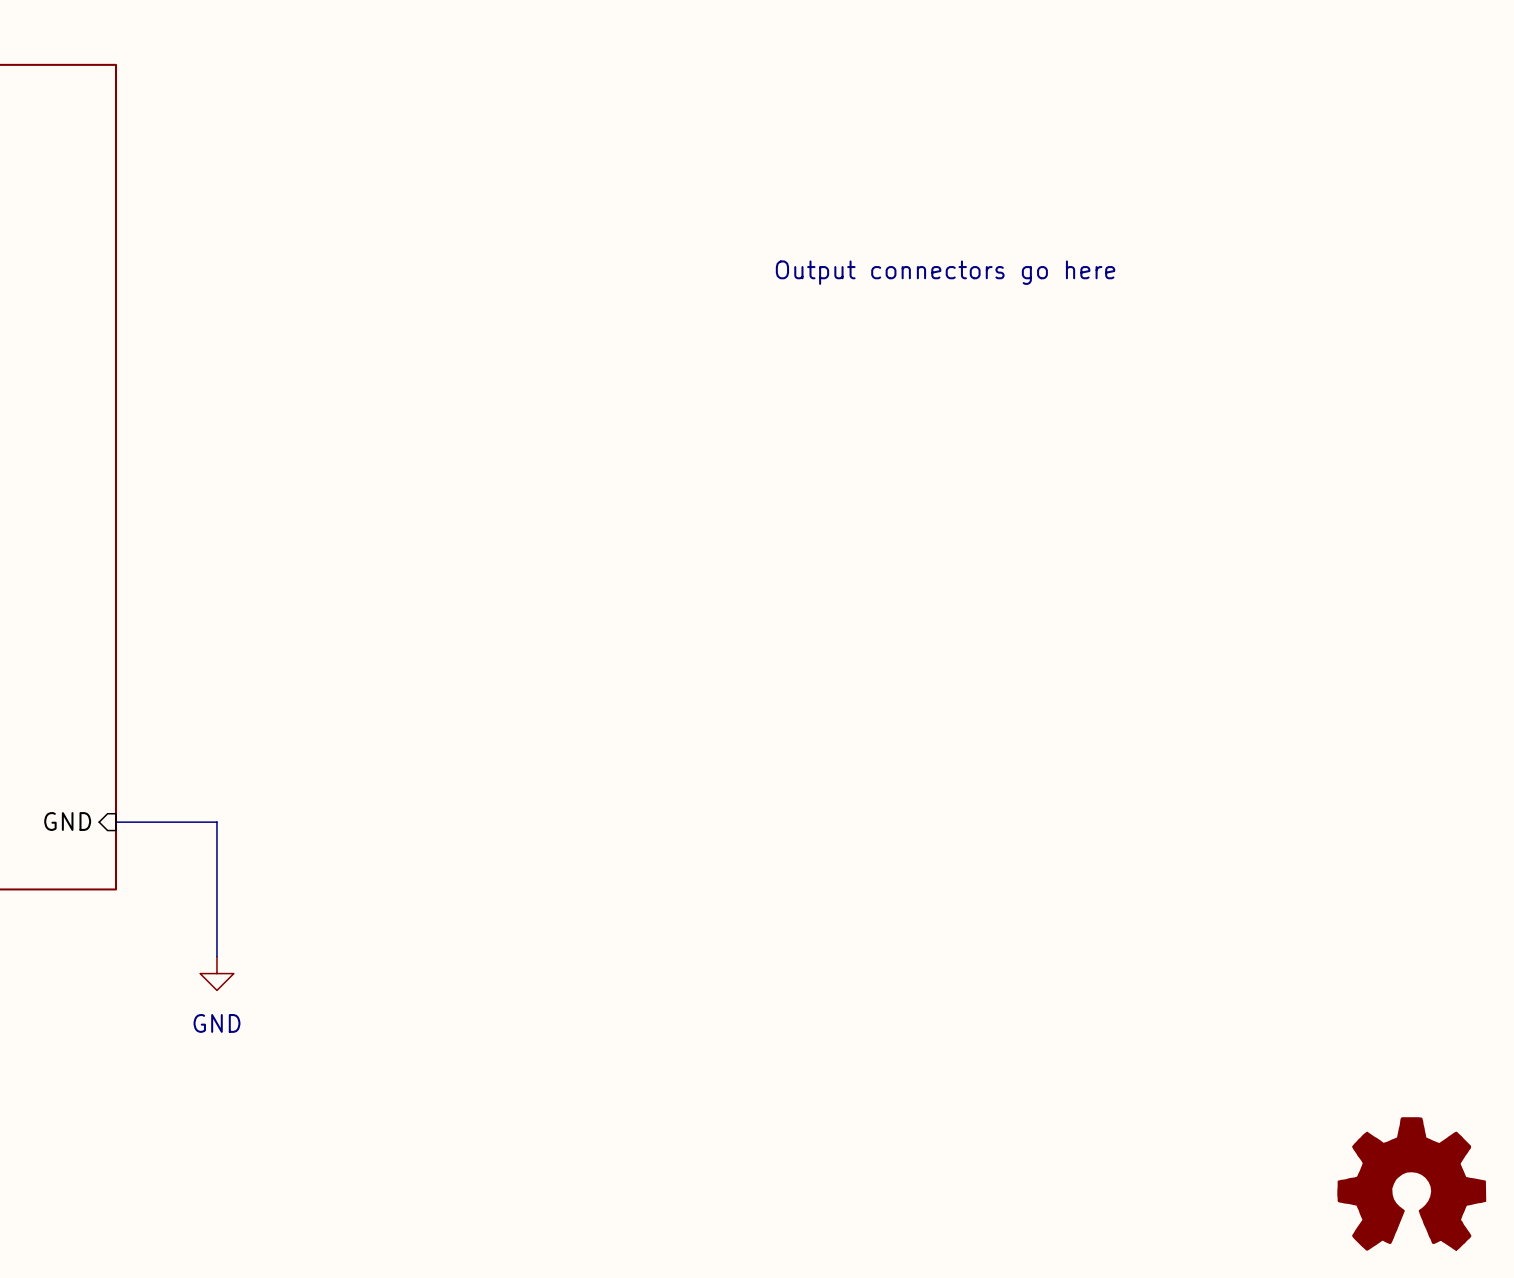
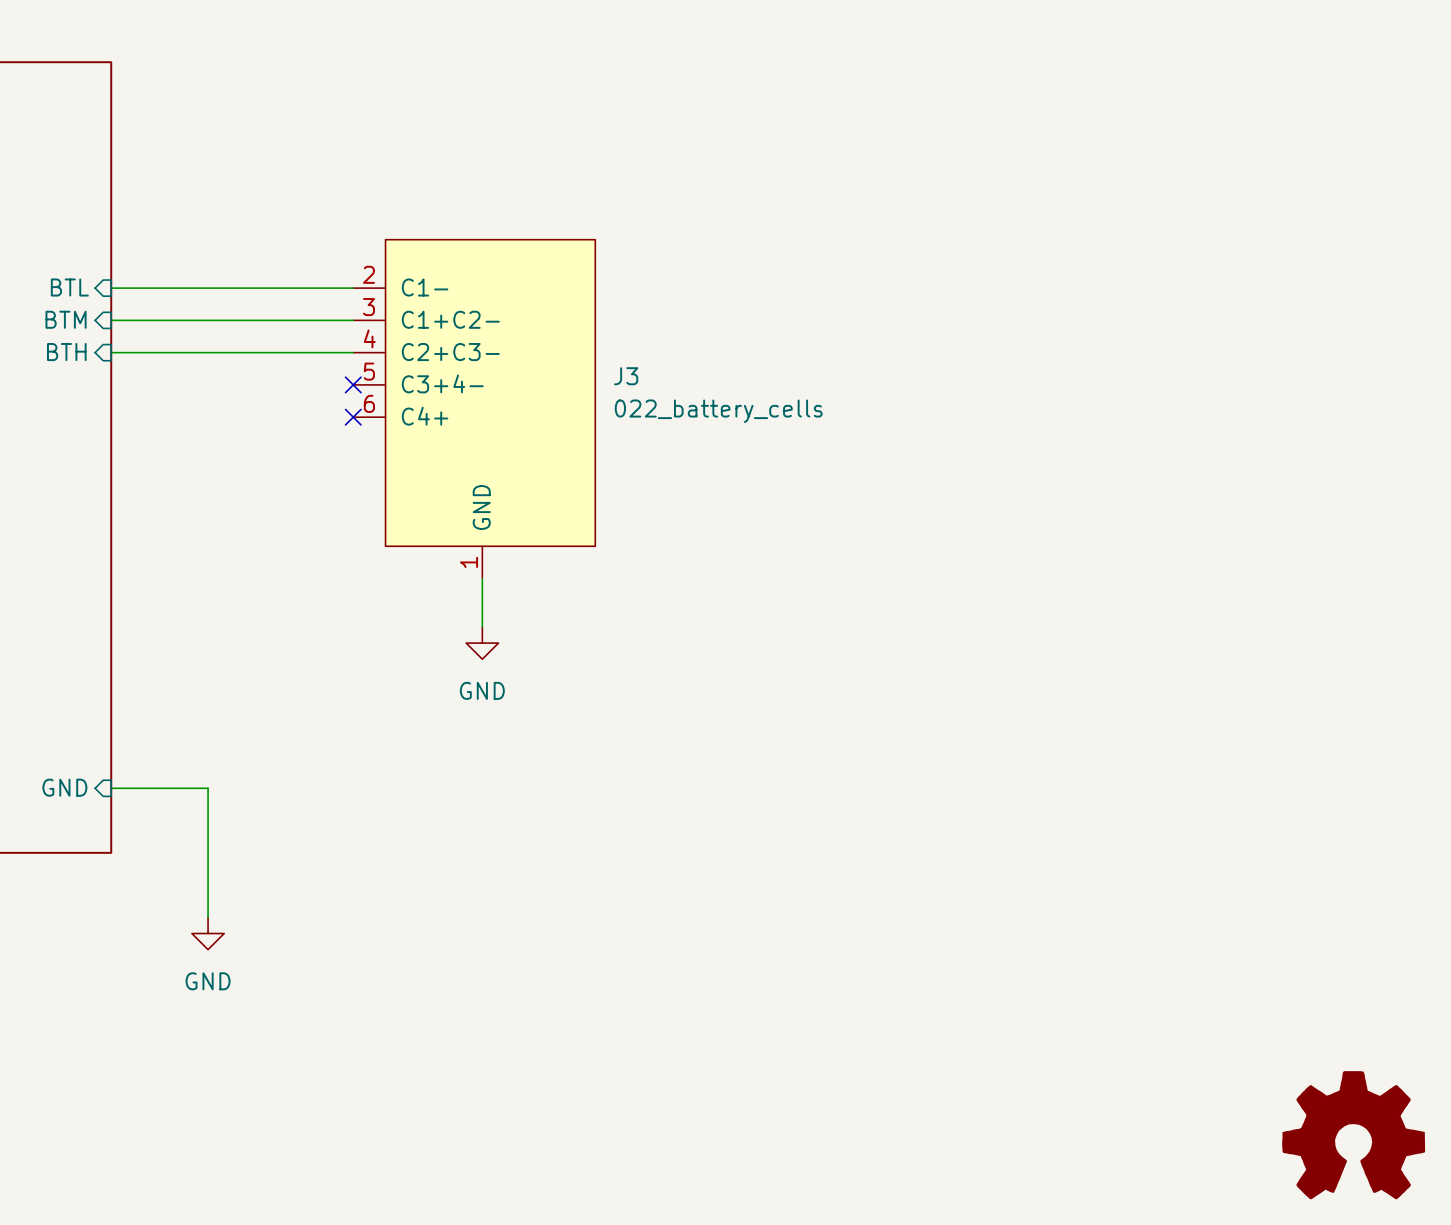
text: Output connectors go here (945, 272) -> none
sheet pin: none -> BTL (69, 287)
wire: none -> (111, 288) (353, 288)
sheet pin: none -> BTM (66, 319)
wire: none -> (111, 320) (353, 320)
sheet pin: none -> BTH (66, 352)
wire: none -> (111, 352) (353, 352)
no-connect mark: none -> (353, 384)
J3: none -> 022_battery_cells (474, 409)
no-connect mark: none -> (353, 417)
wire: none -> (482, 578) (482, 626)
power symbol: none -> GND (482, 643)

